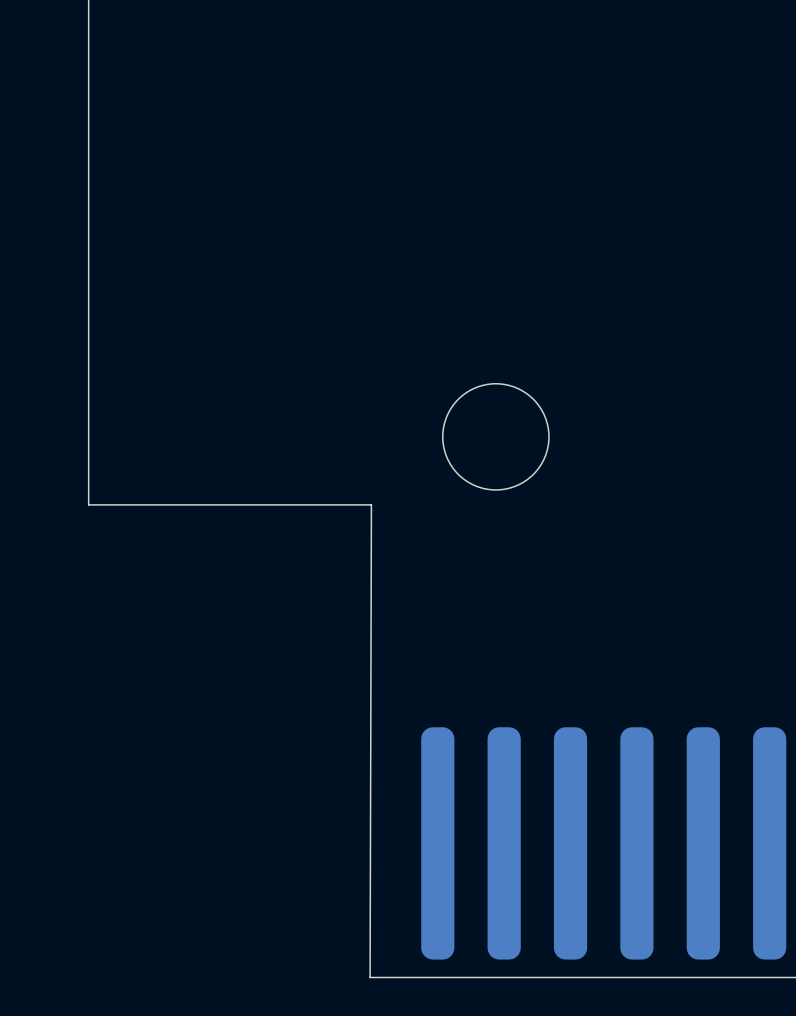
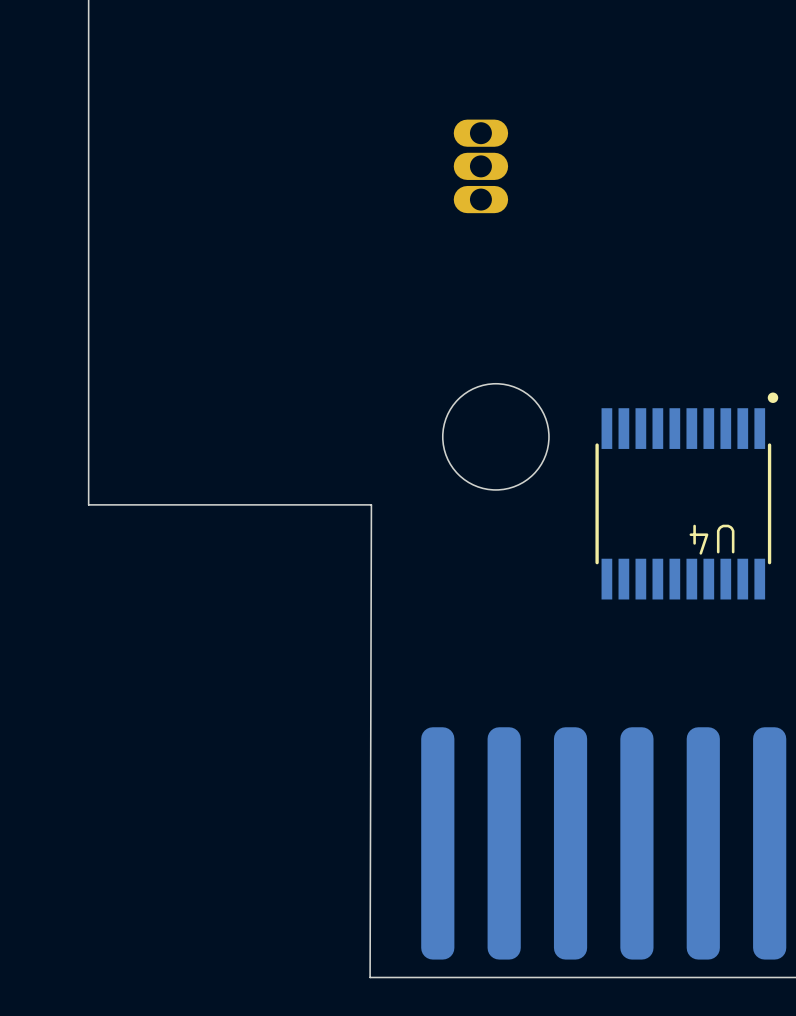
part: none -> (480, 166)
U4: none -> (686, 496)

